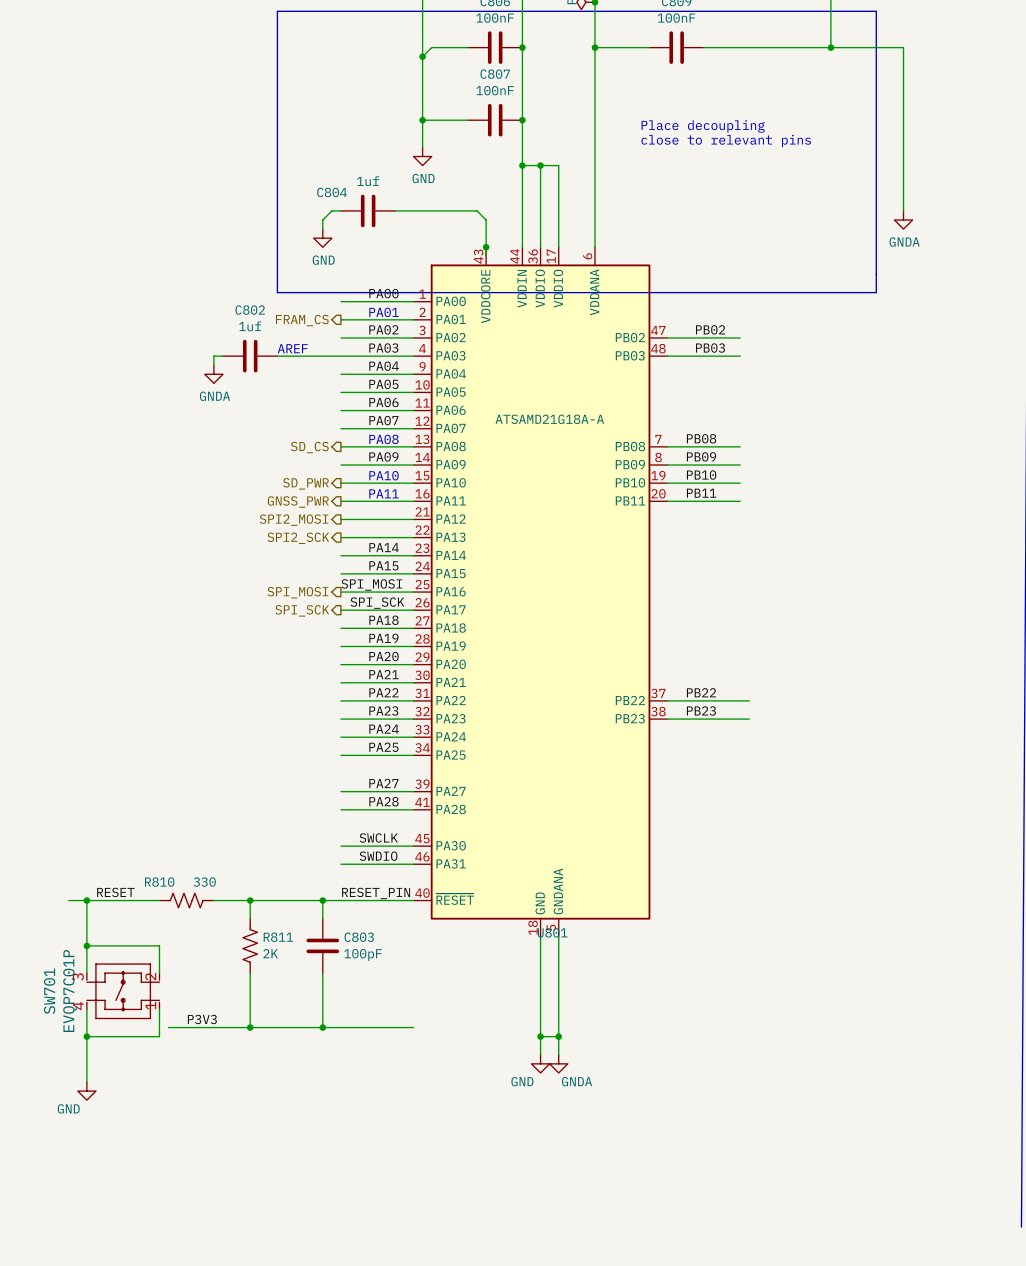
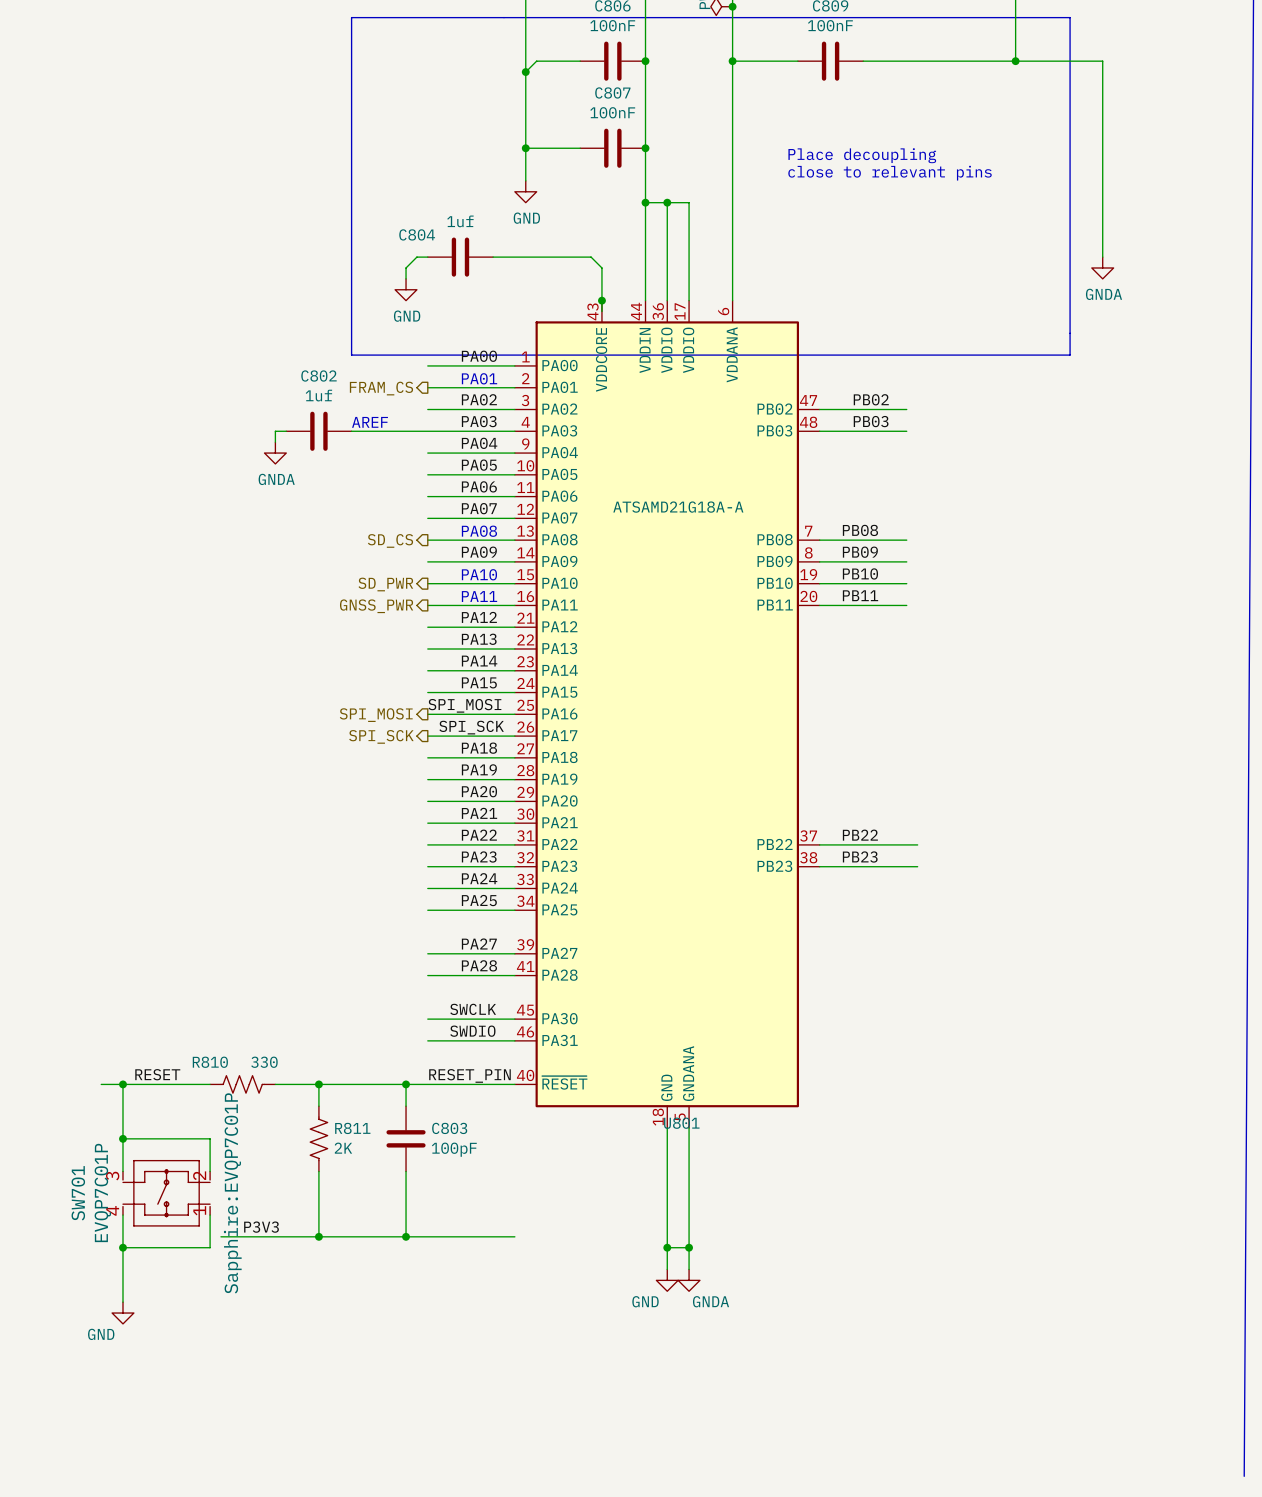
label: none -> PA12 (479, 617)
hierarchical label: SPI2_MOSI (294, 520) -> none
label: none -> PA13 (479, 639)
hierarchical label: SPI2_SCK (298, 538) -> none
SW701 text: none -> Sapphire:EVQP7C01P (232, 1193)

